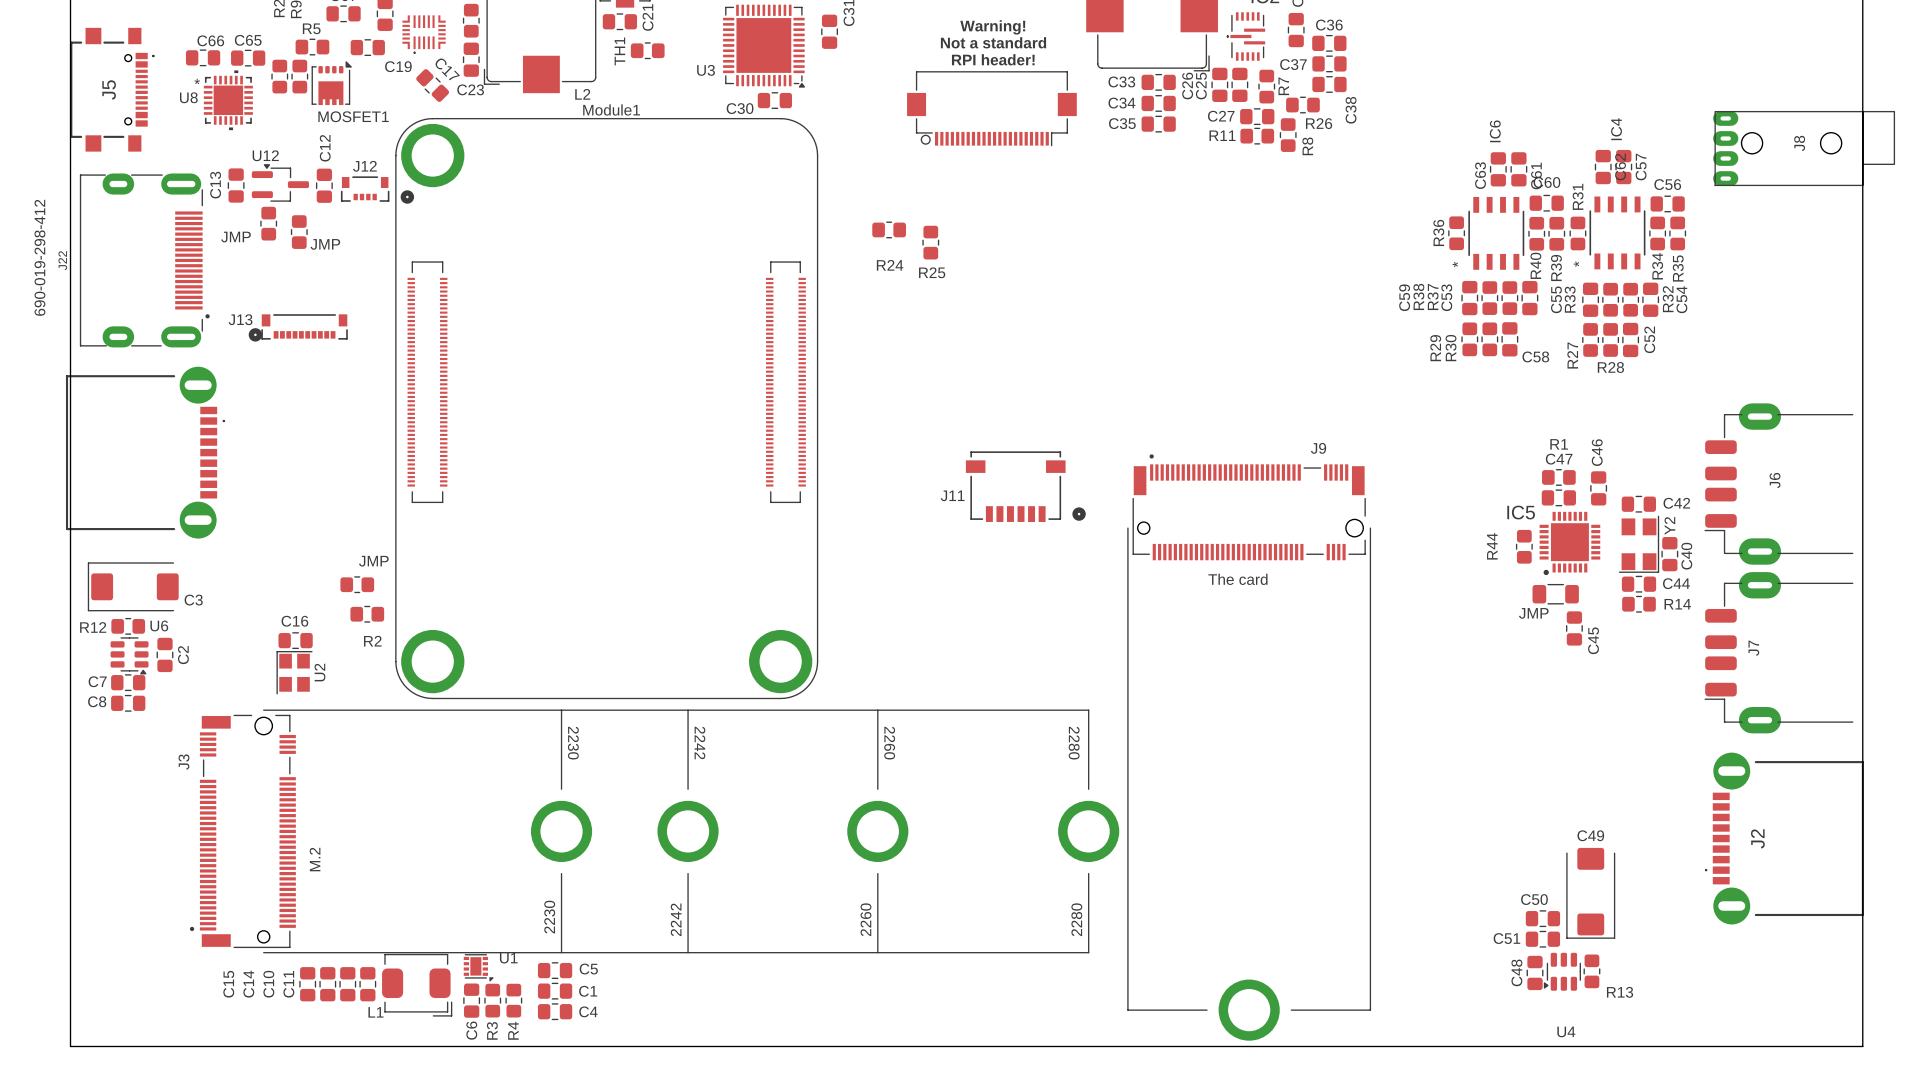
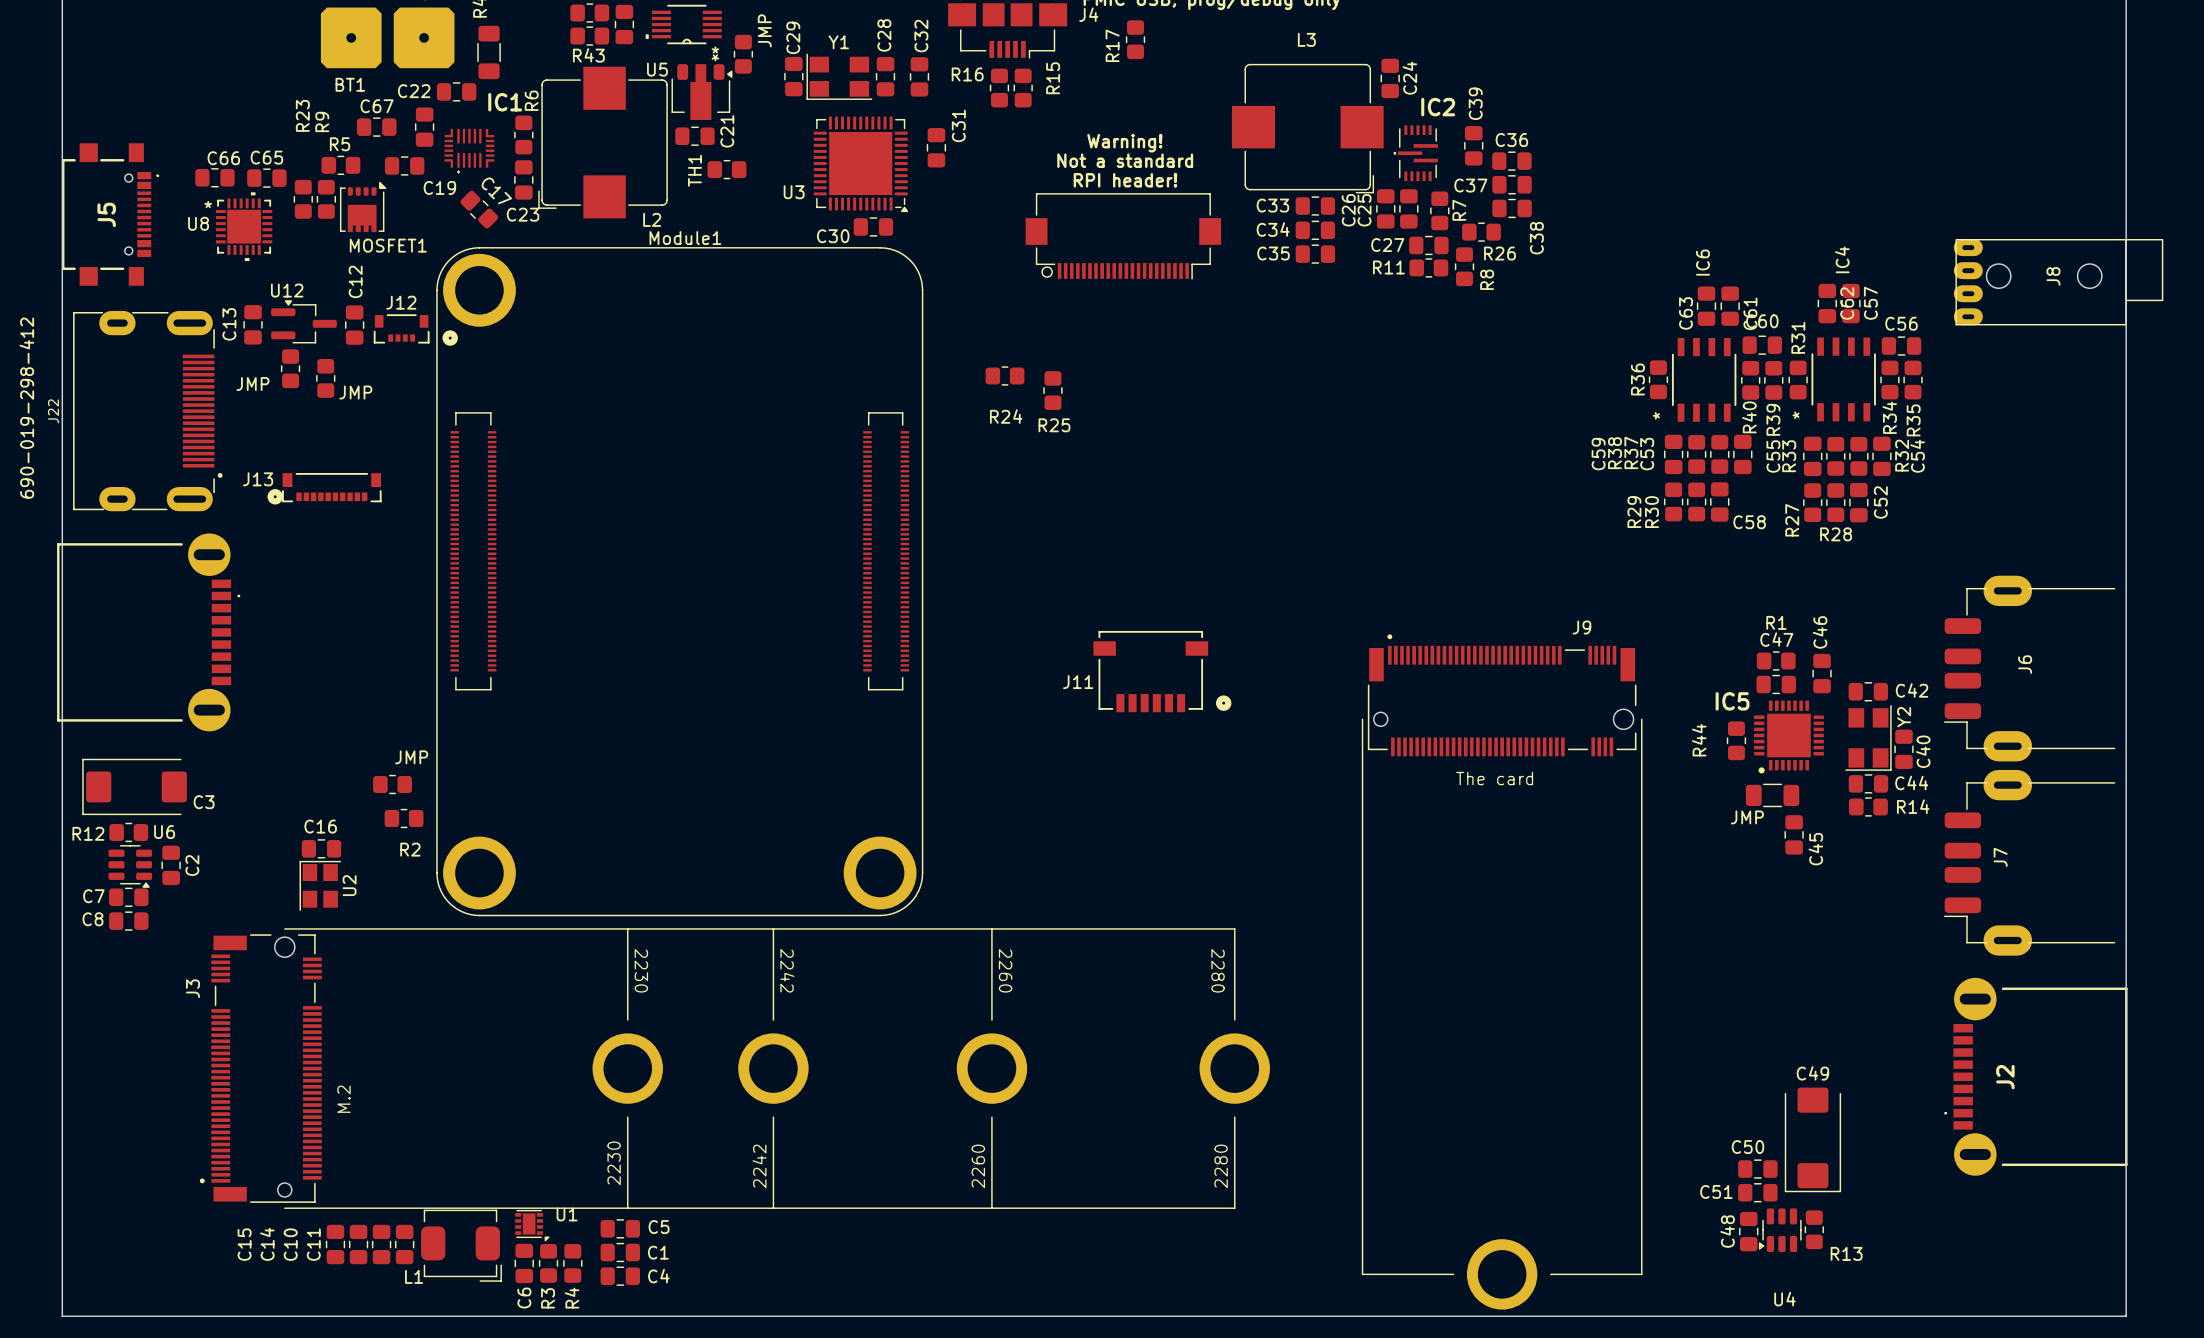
J9 position: (1249, 747) -> (1502, 971)

